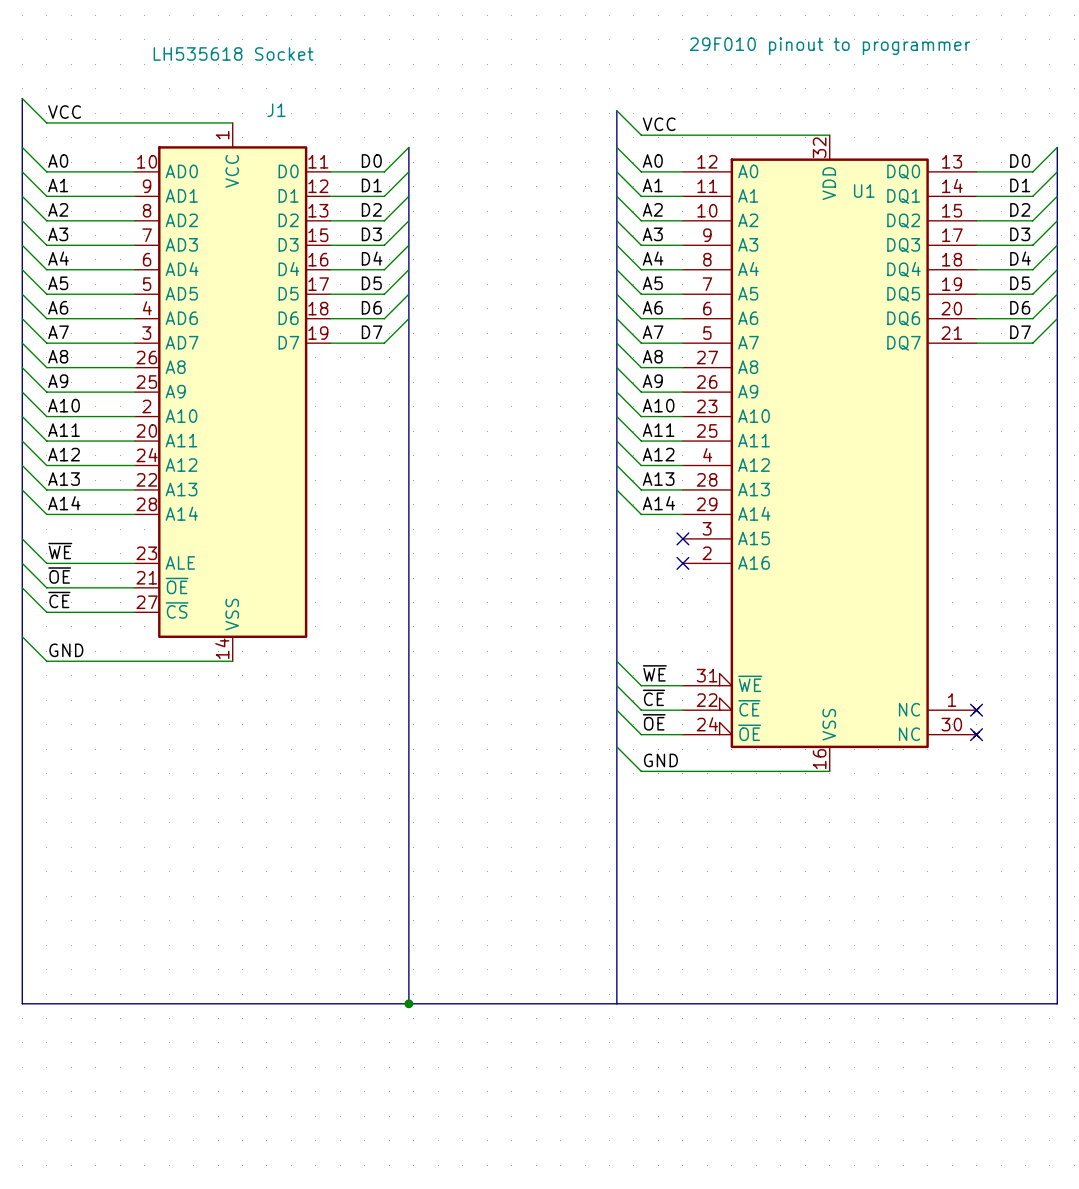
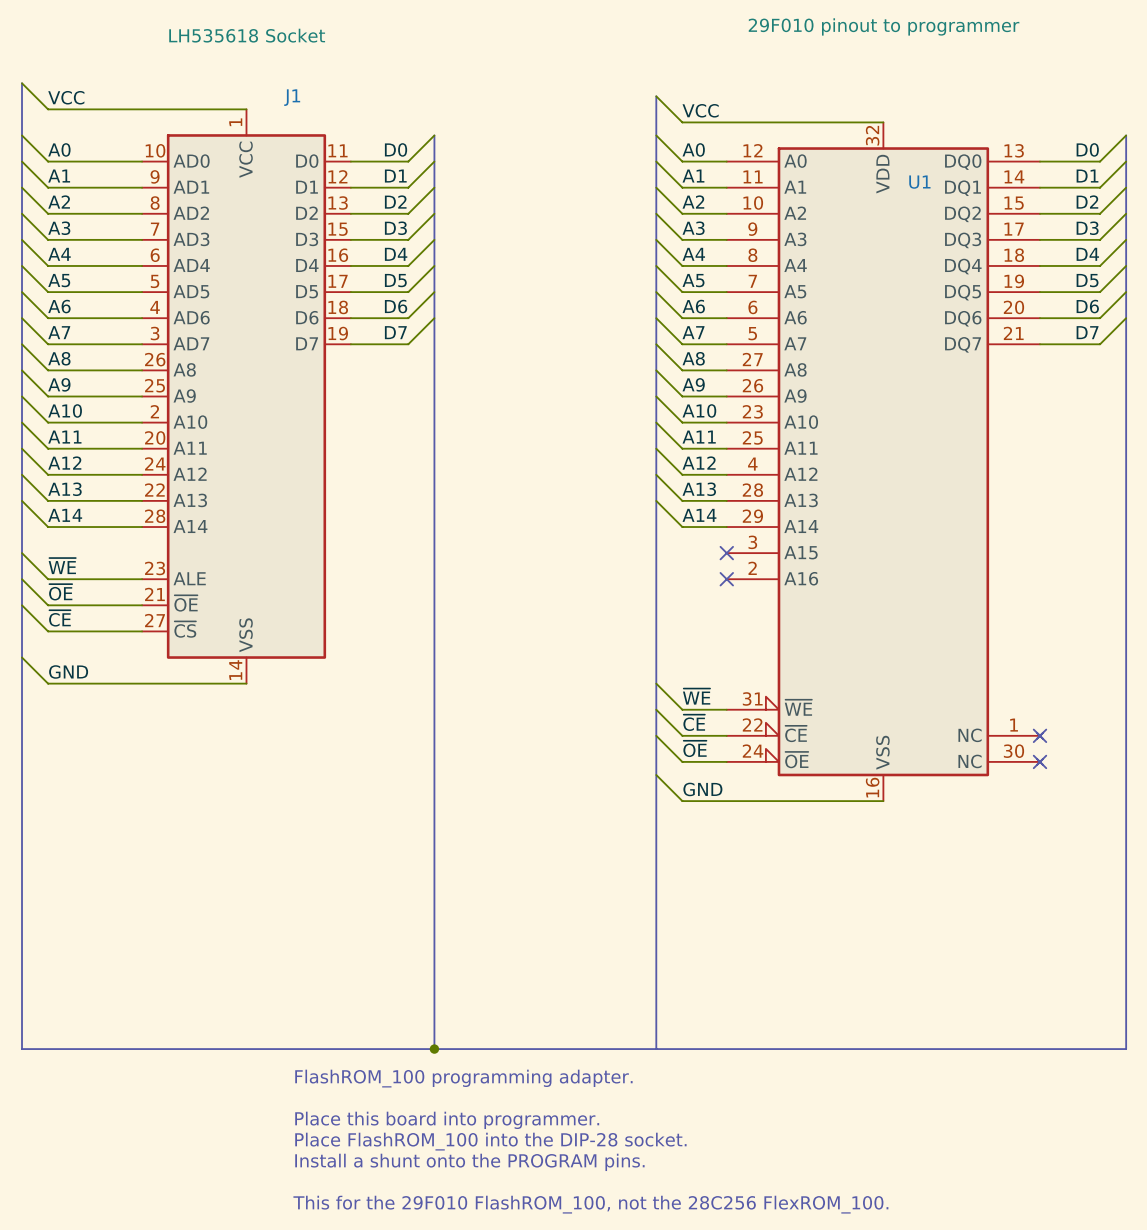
text: none -> FlashROM_100 programming adapter. (463, 1078)
text: none -> Place this board into programmer. (447, 1120)
text: none -> Place FlashROM_100 into the DIP-28 socket. (490, 1141)
text: none -> Install a shunt onto the PROGRAM pins. (469, 1162)
text: none -> This for the 29F010 FlashROM_100, not the 28C256 FlexROM_100. (590, 1204)

